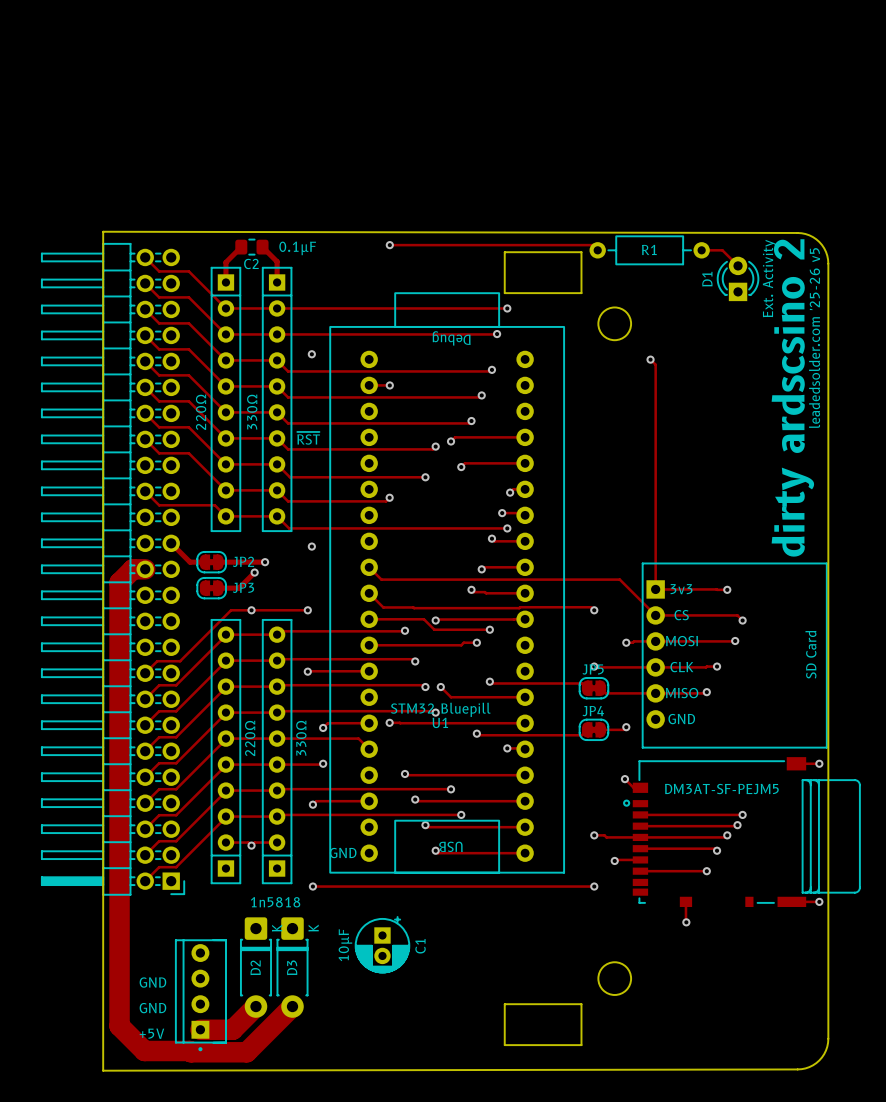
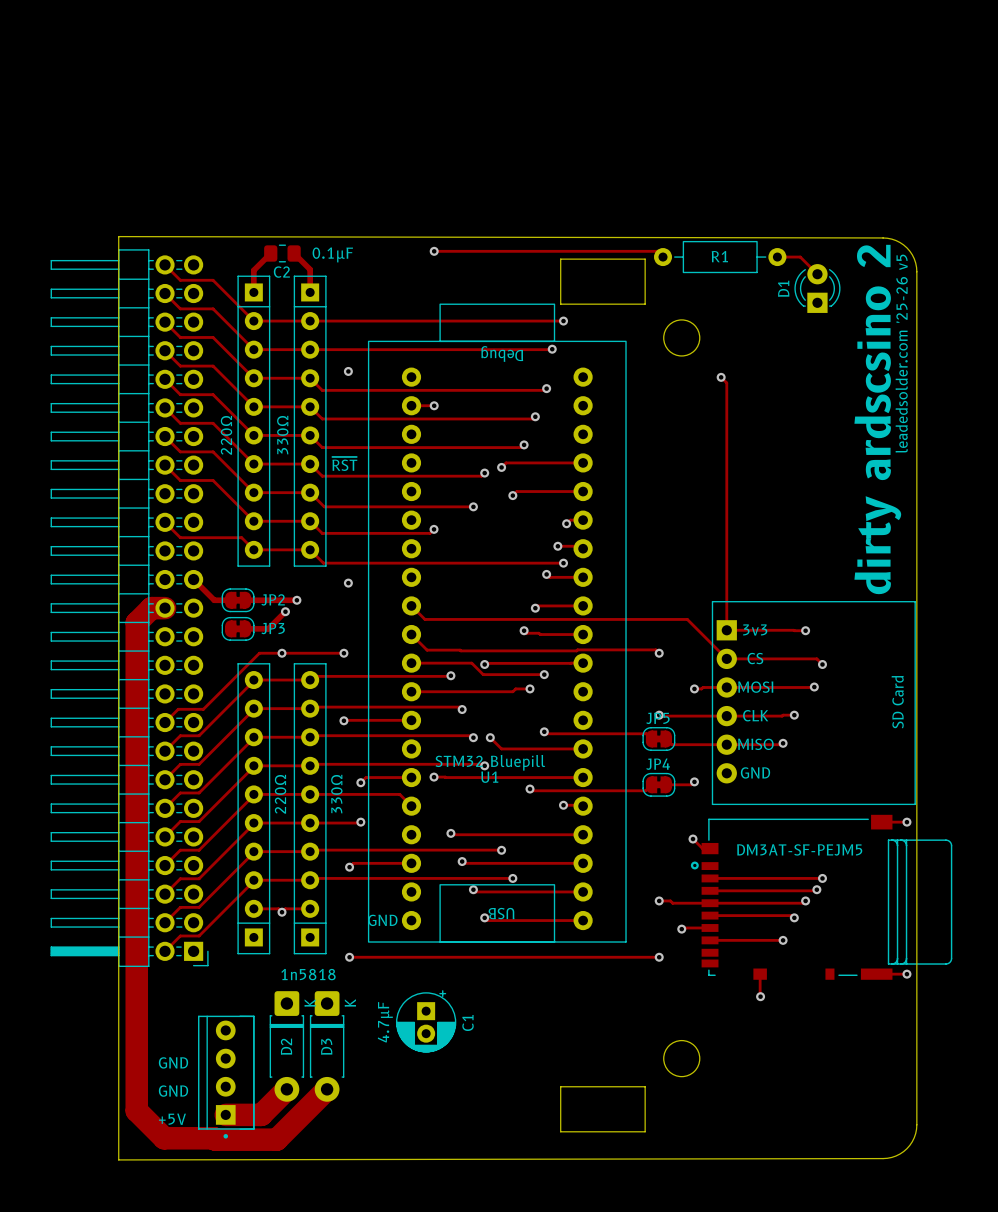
D1 value: Ext. Activity (769, 278) -> none
C1 value: 10µF (345, 945) -> 4.7µF (385, 1022)

